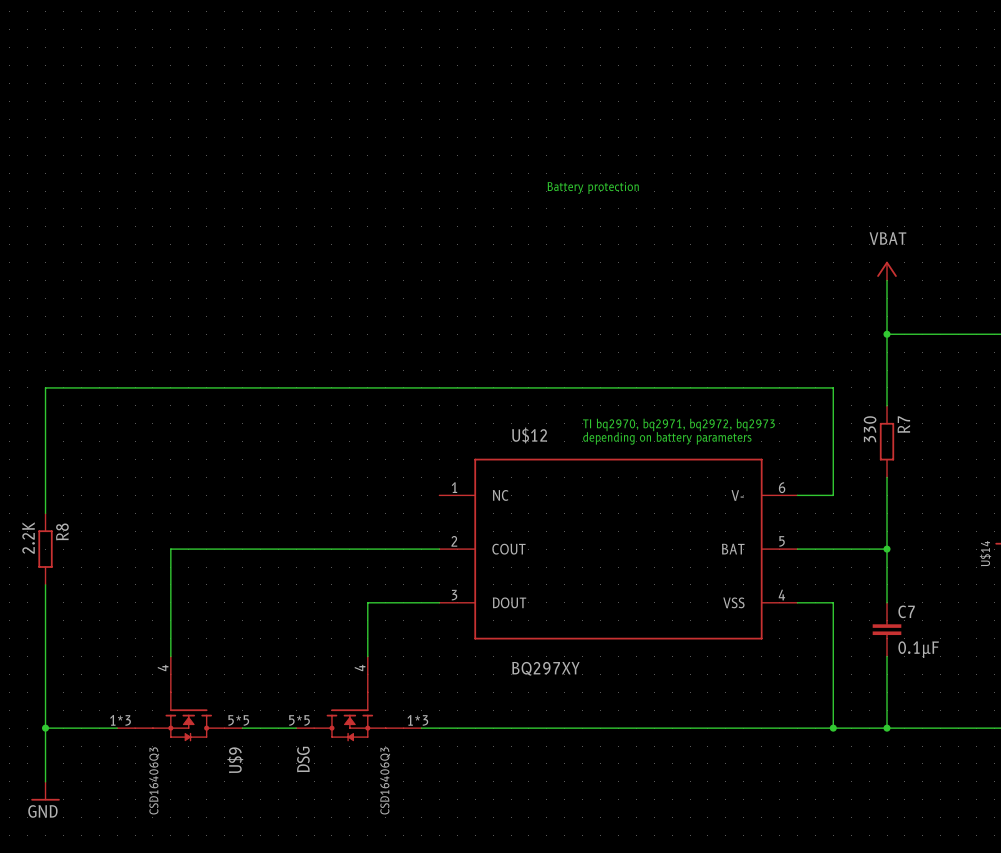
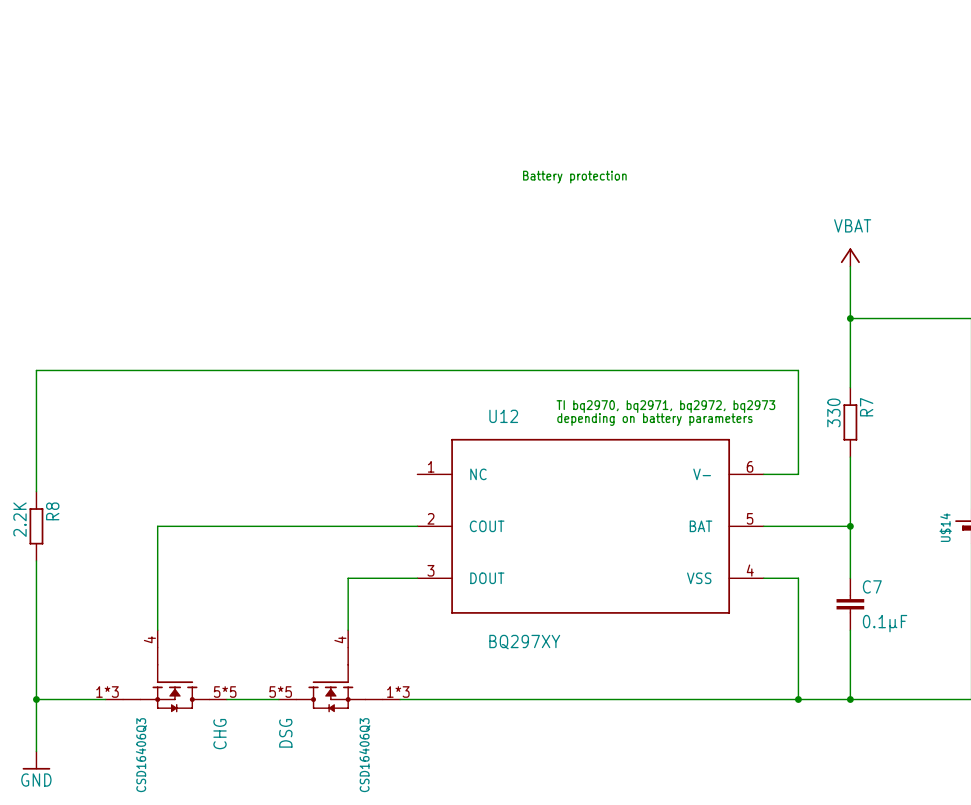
U$12 name: U$12 (529, 435) -> U12 (503, 416)
U$9 name: U$9 (235, 760) -> CHG (220, 734)

